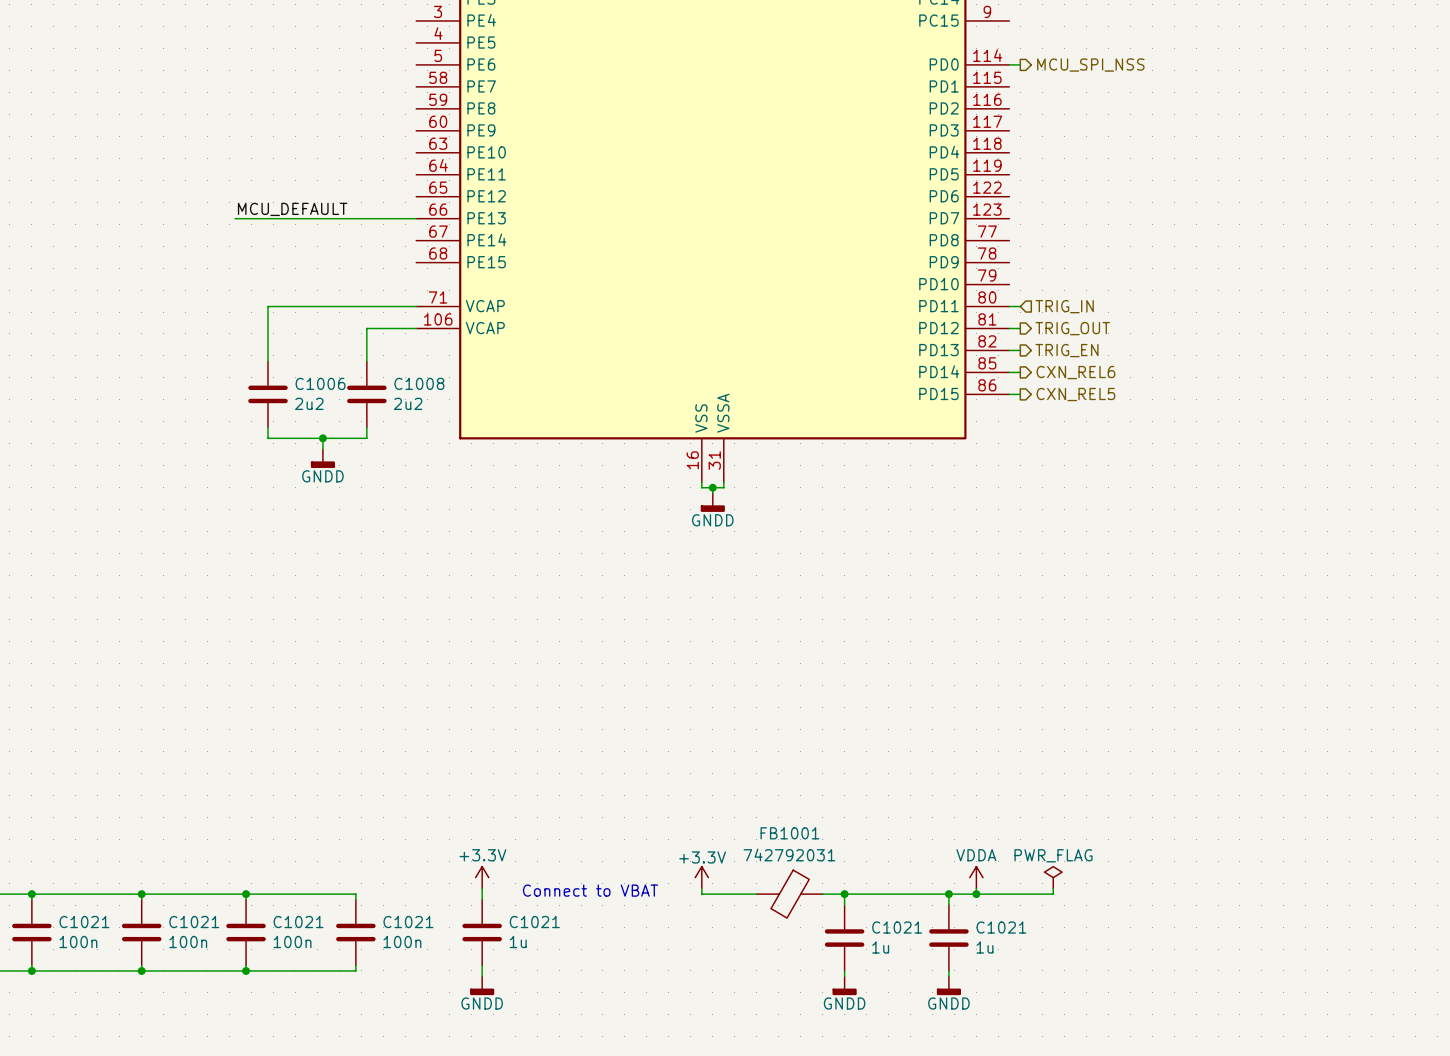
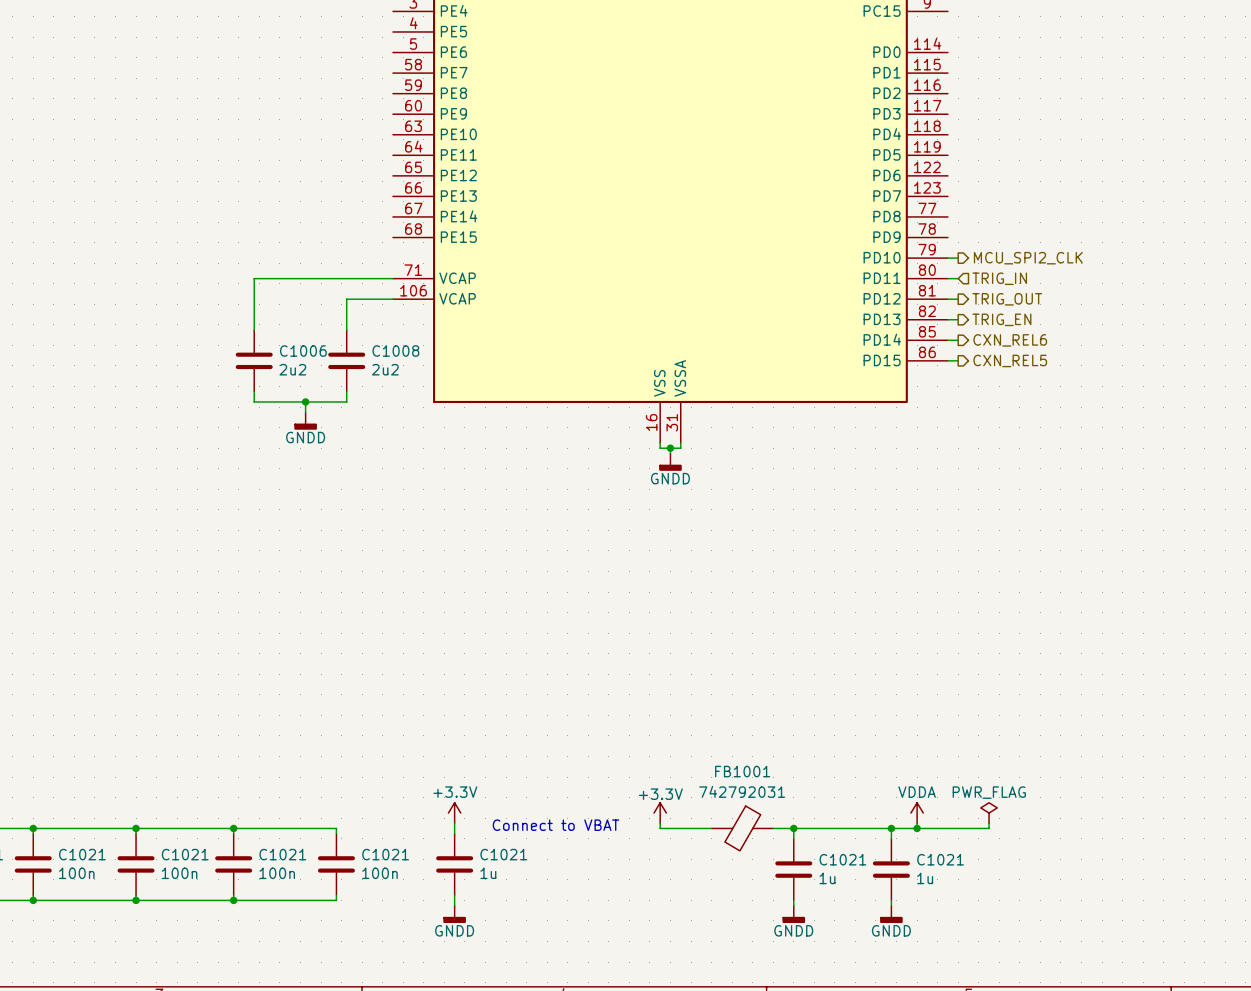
wire: (1009, 64) (1020, 64) -> none
hierarchical label: MCU_SPI_NSS (1090, 65) -> none
label: MCU_DEFAULT (292, 209) -> none
wire: (235, 218) (416, 218) -> none
wire: none -> (947, 258) (958, 258)
hierarchical label: none -> MCU_SPI2_CLK (1028, 258)

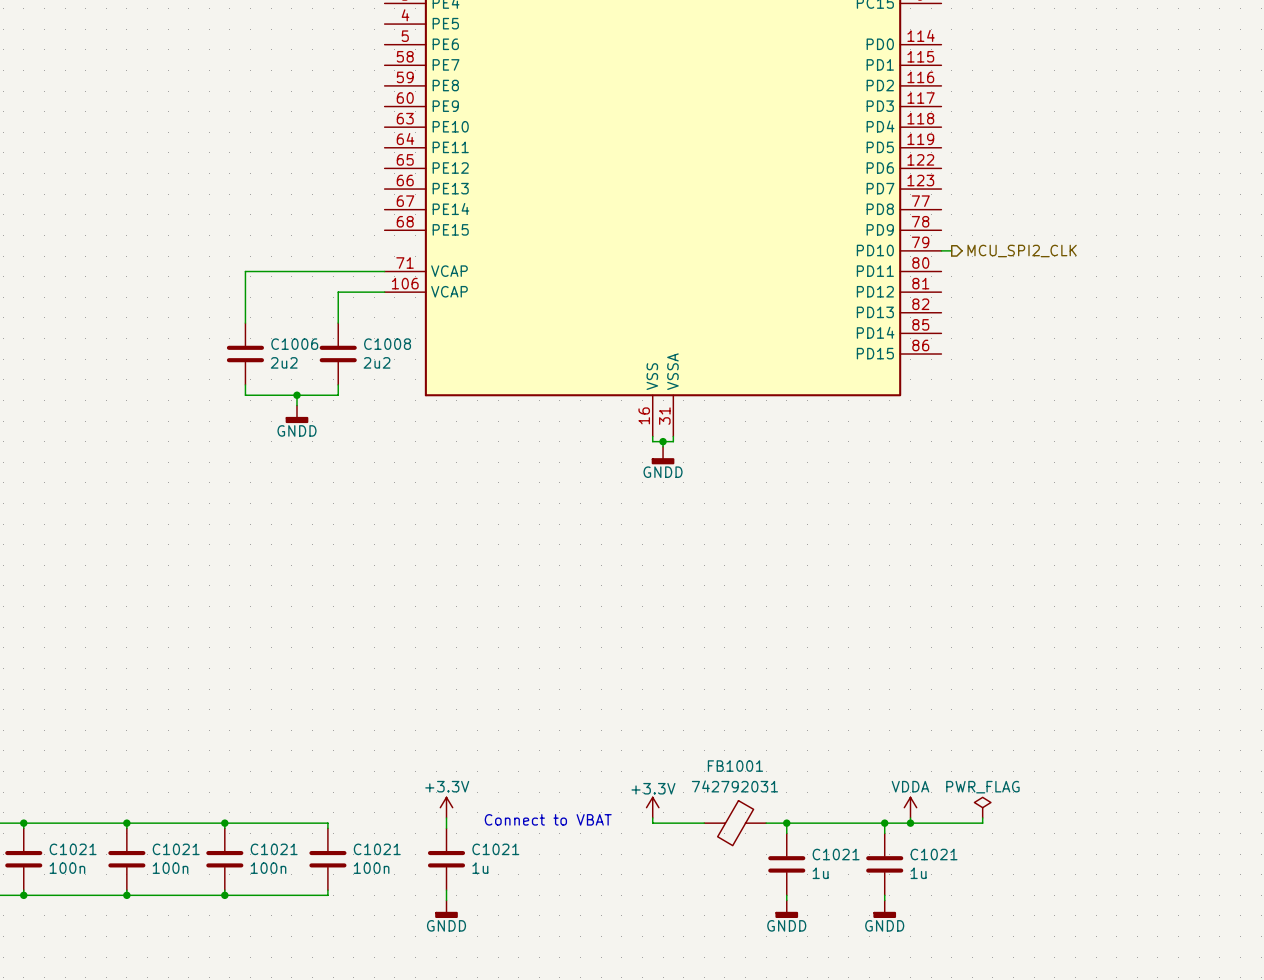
wire: (947, 278) (958, 278) -> none
hierarchical label: TRIG_IN (999, 278) -> none
wire: (947, 299) (958, 299) -> none
hierarchical label: TRIG_OUT (1007, 299) -> none
wire: (947, 319) (958, 319) -> none
hierarchical label: TRIG_EN (1001, 319) -> none
wire: (947, 340) (958, 340) -> none
hierarchical label: CXN_REL6 (1010, 340) -> none
wire: (947, 360) (958, 360) -> none
hierarchical label: CXN_REL5 (1010, 360) -> none

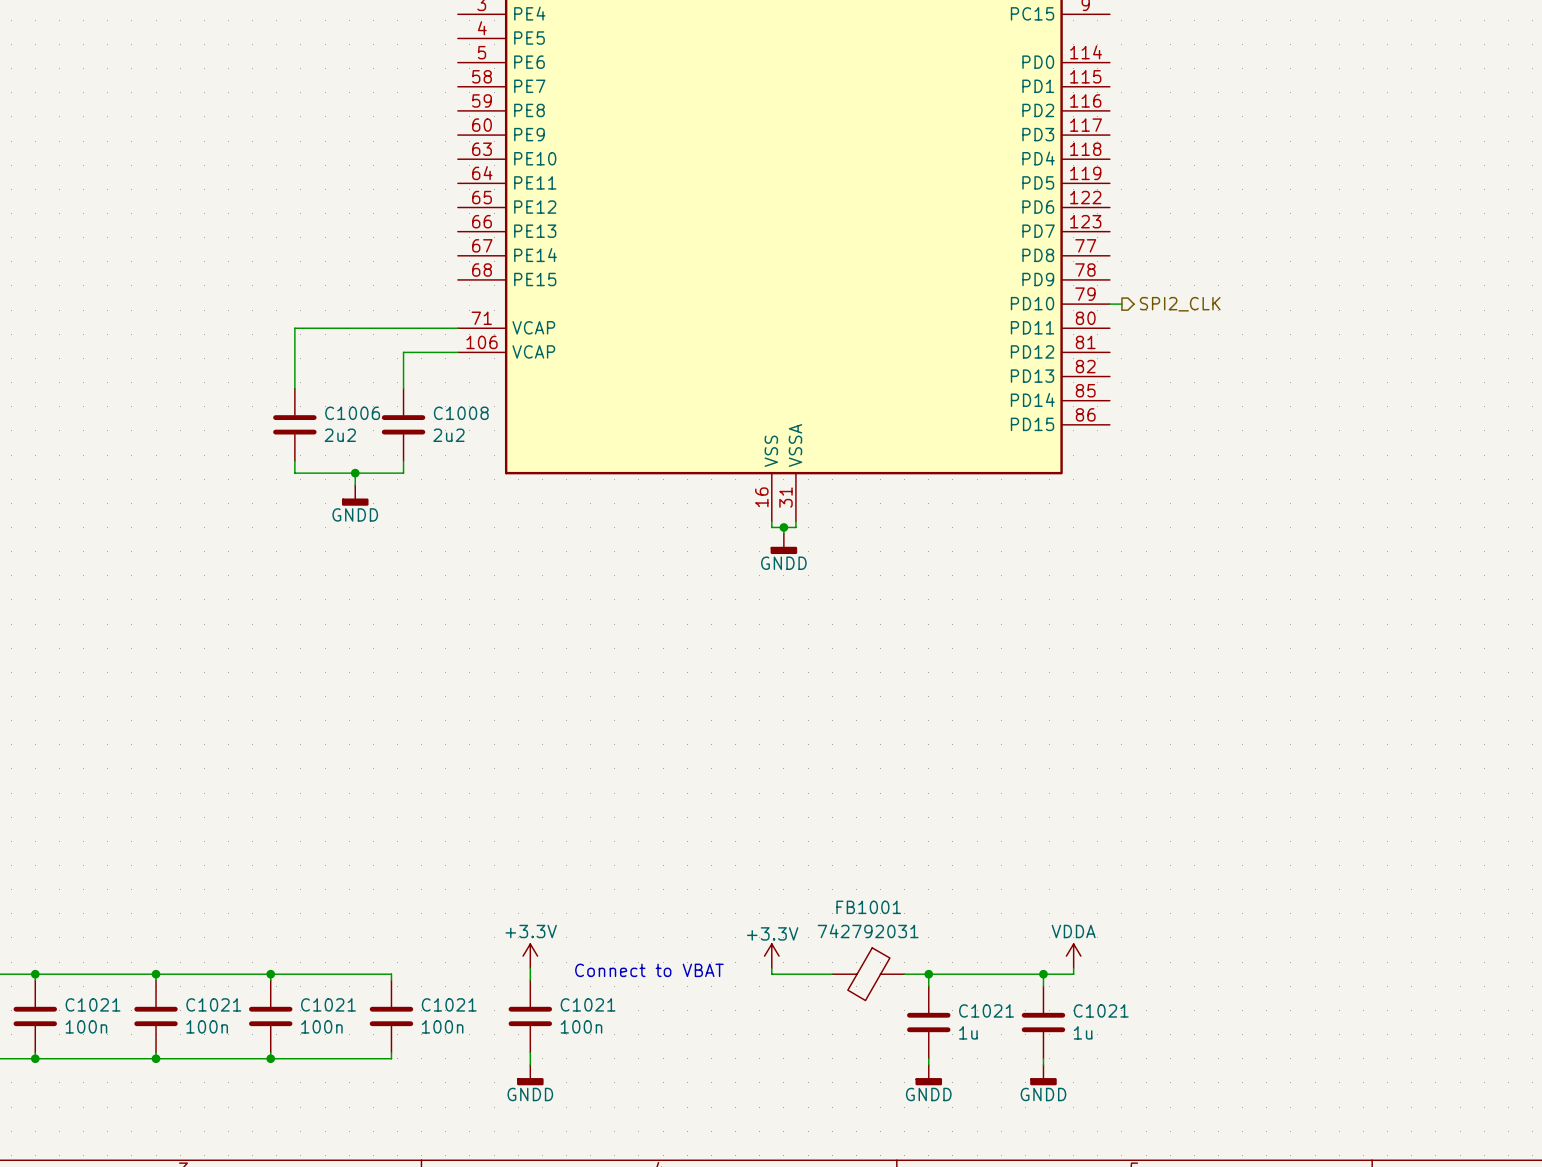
hierarchical label: MCU_SPI2_CLK (1022, 250) -> SPI2_CLK (1180, 304)
power symbol: PWR_FLAG (982, 807) -> none
wire: (982, 817) (982, 823) (910, 823) -> none
junction: (910, 823) -> none
C1021 value: 1u (480, 868) -> 100n (581, 1026)

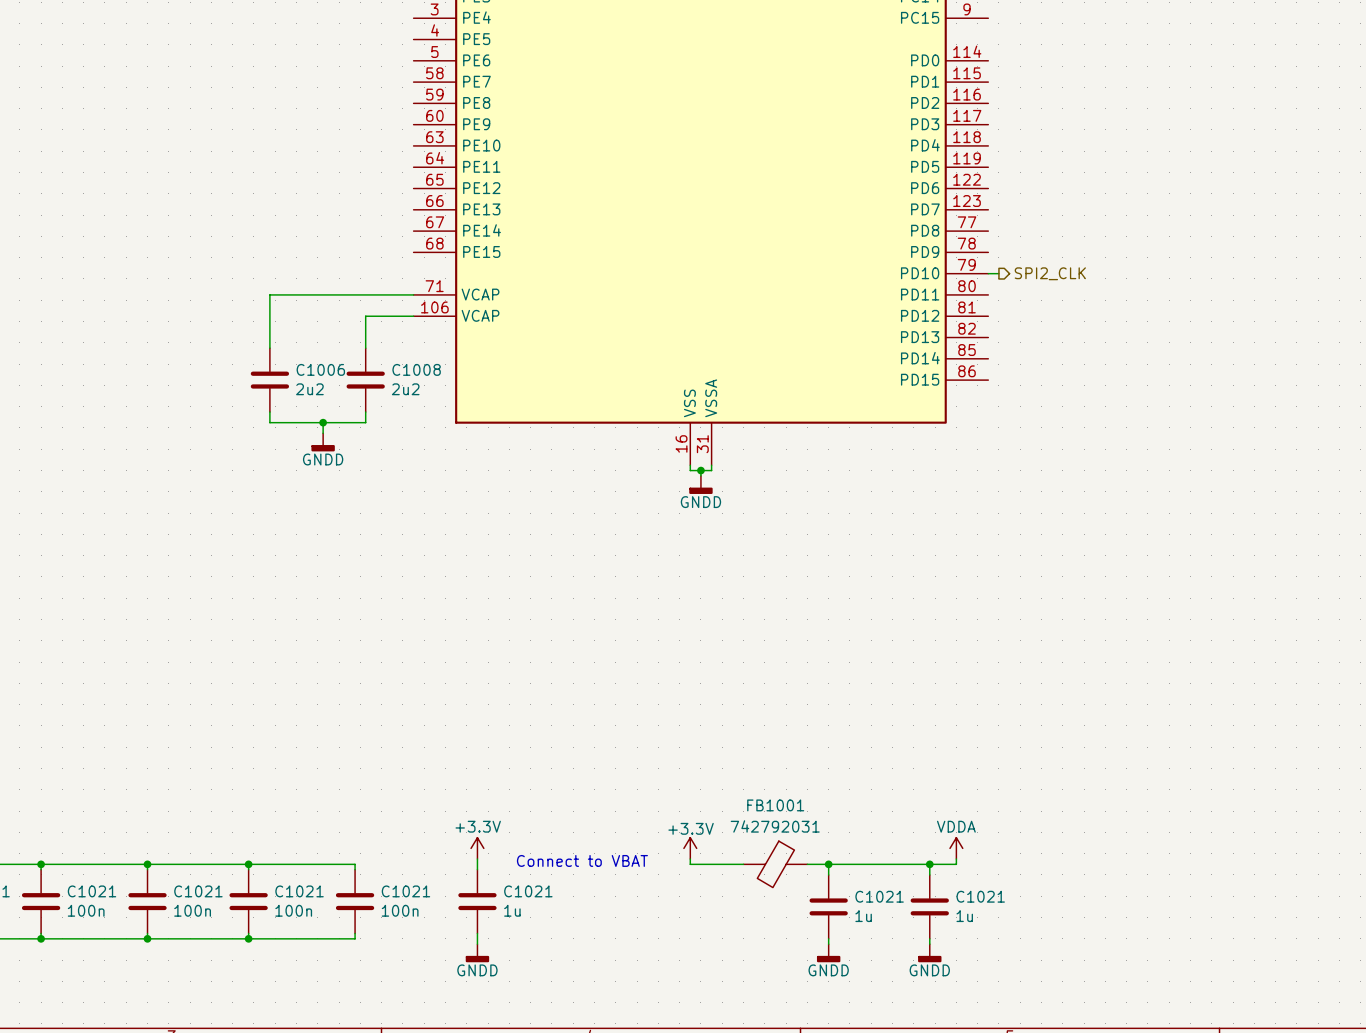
C1021 value: 100n (581, 1026) -> 1u (512, 910)

